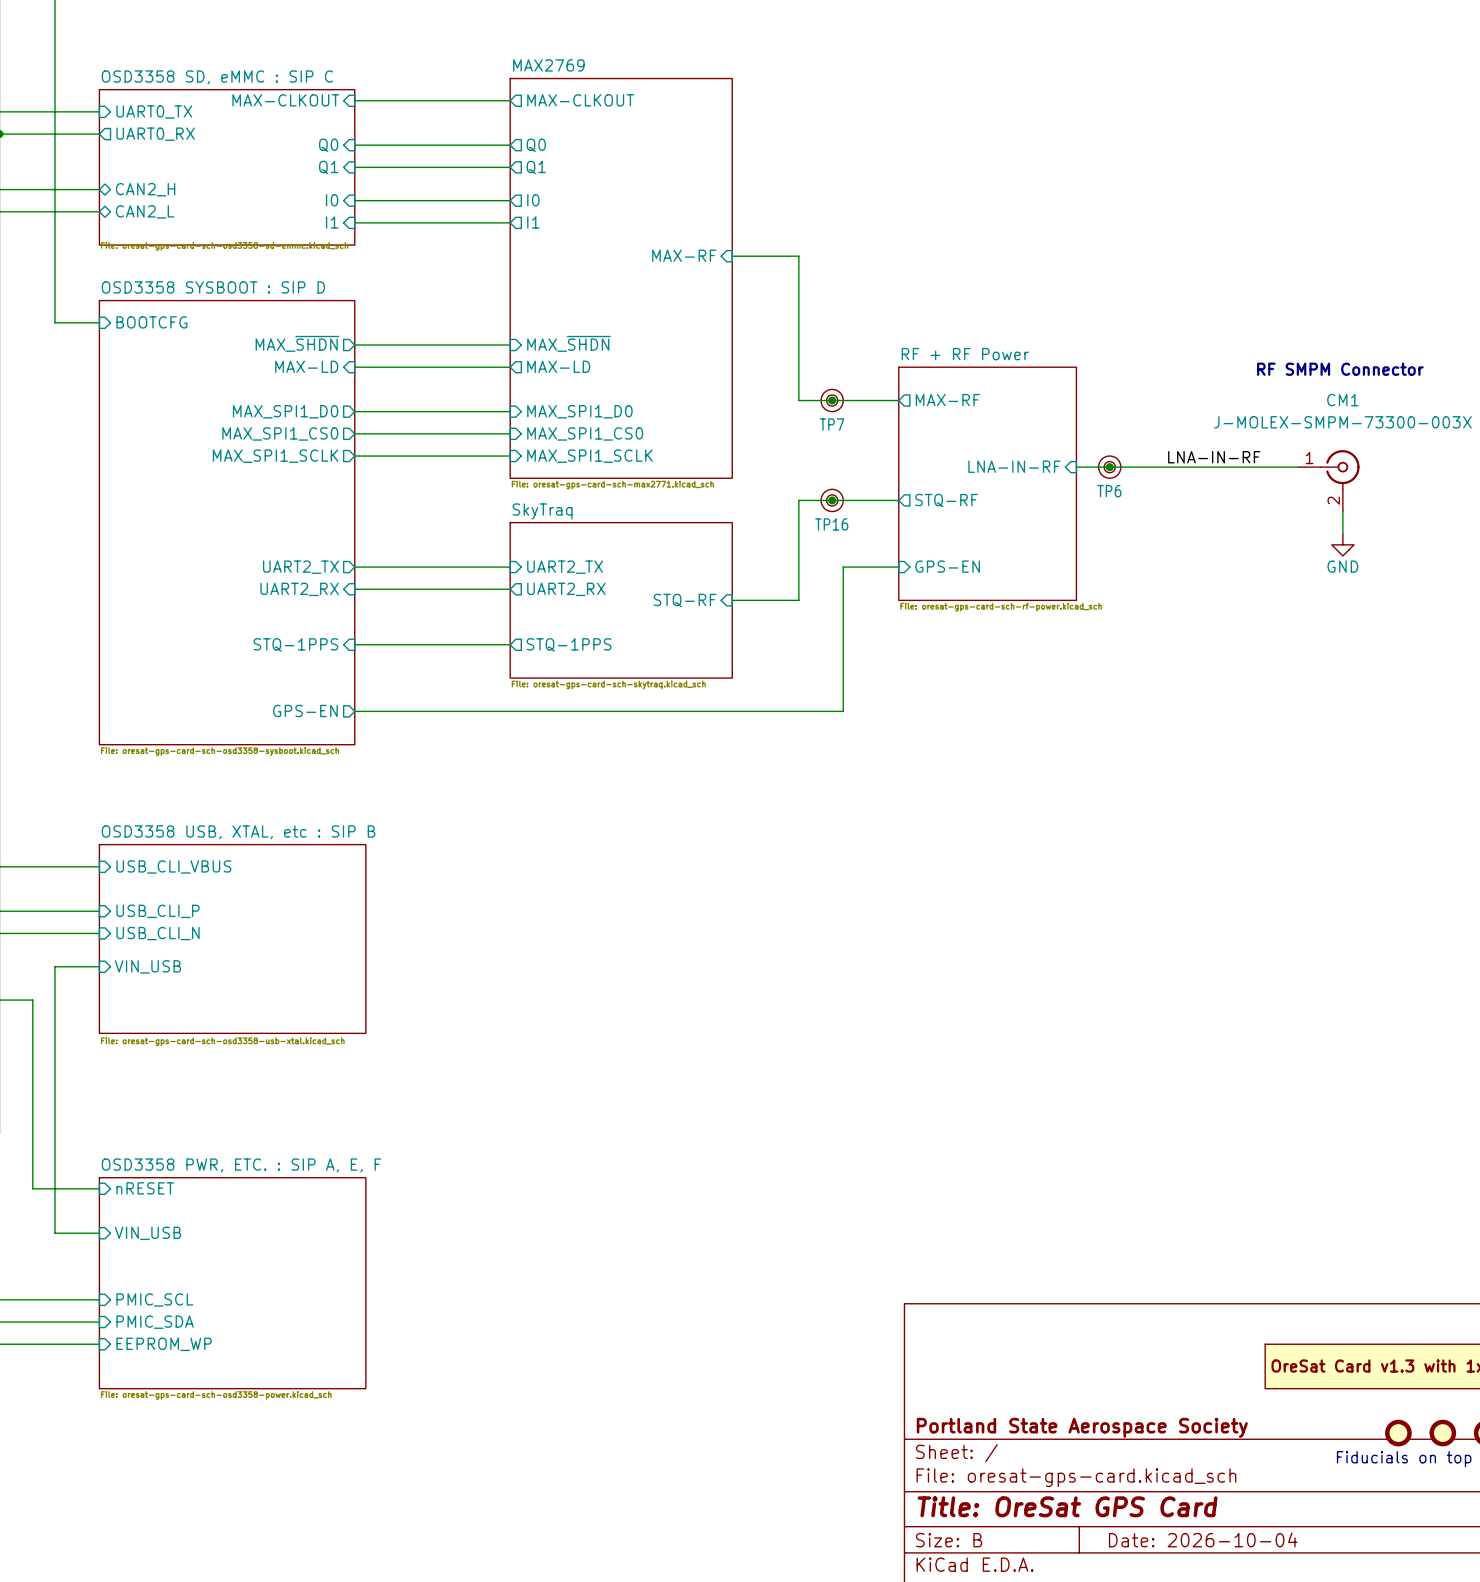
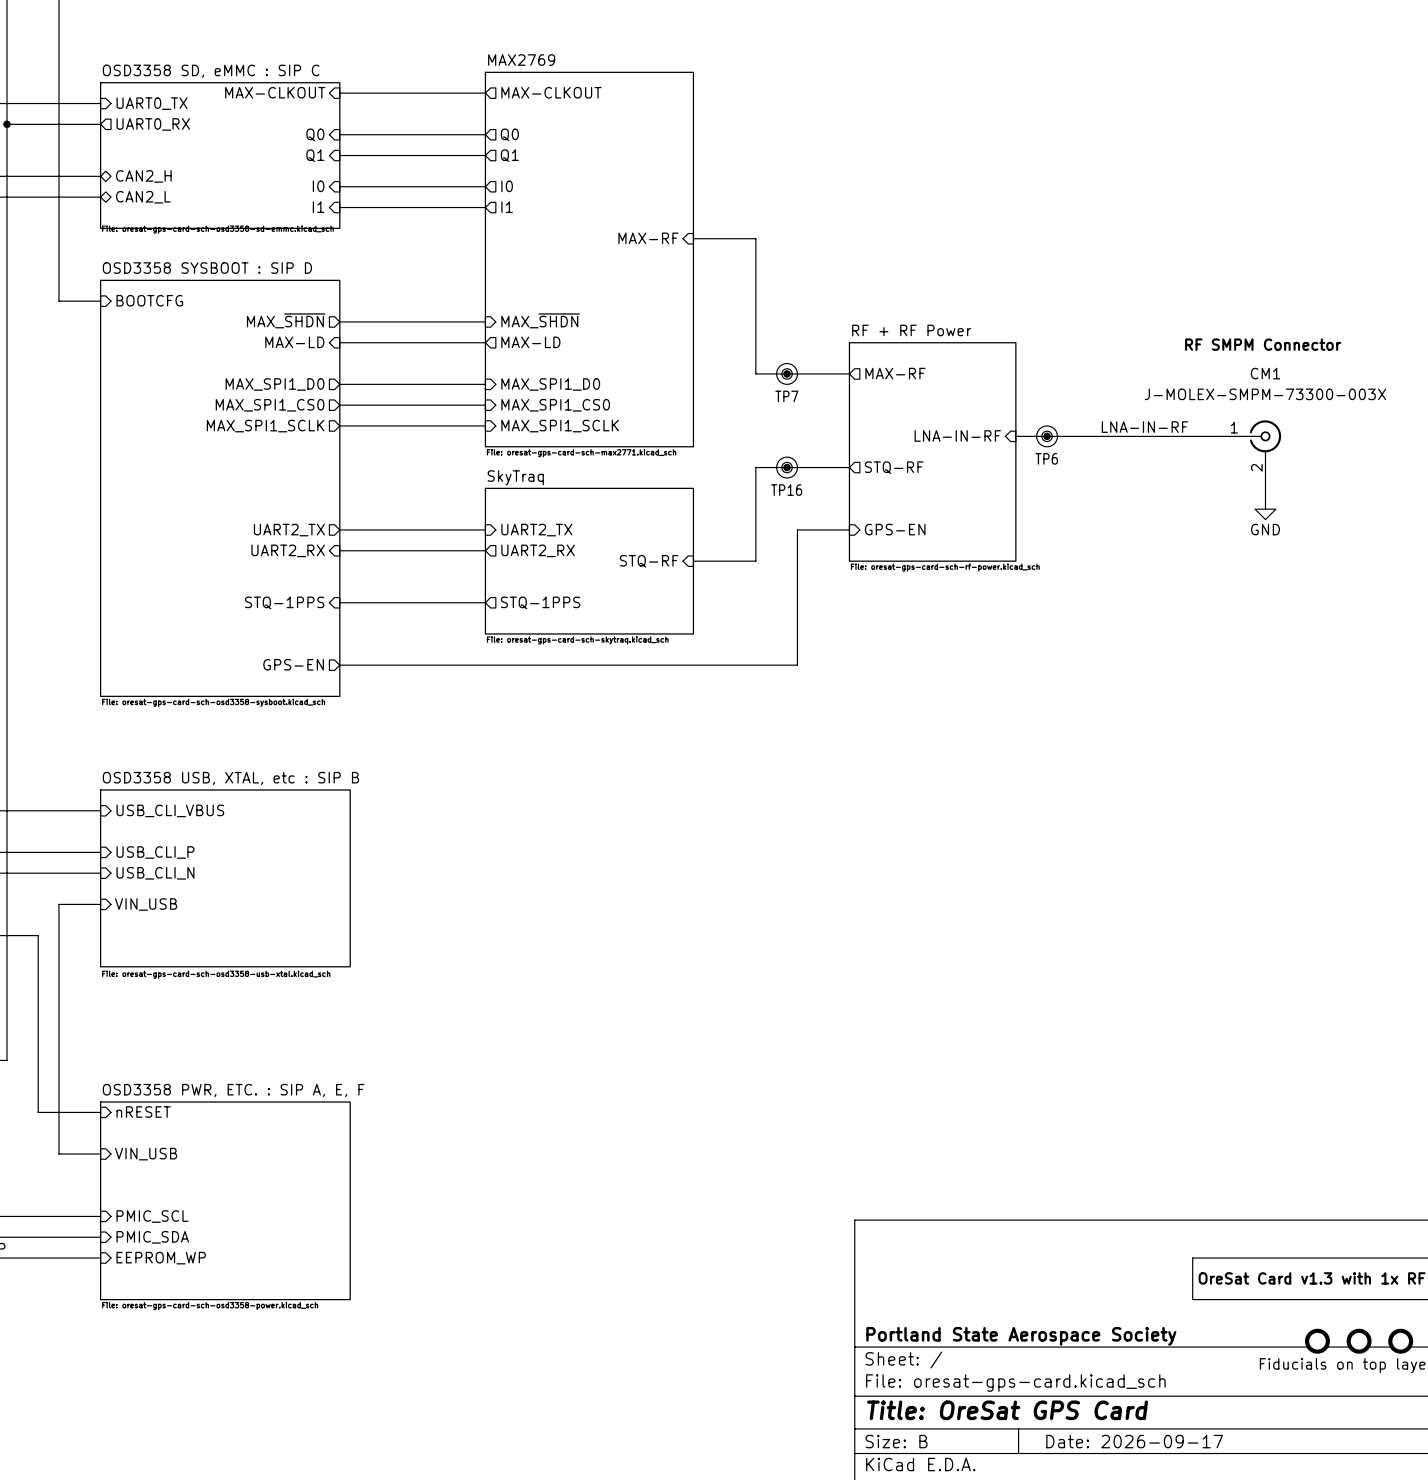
title block: Date: 2026-10-04 (1203, 1539) -> Date: 2026-09-17 (1134, 1441)

